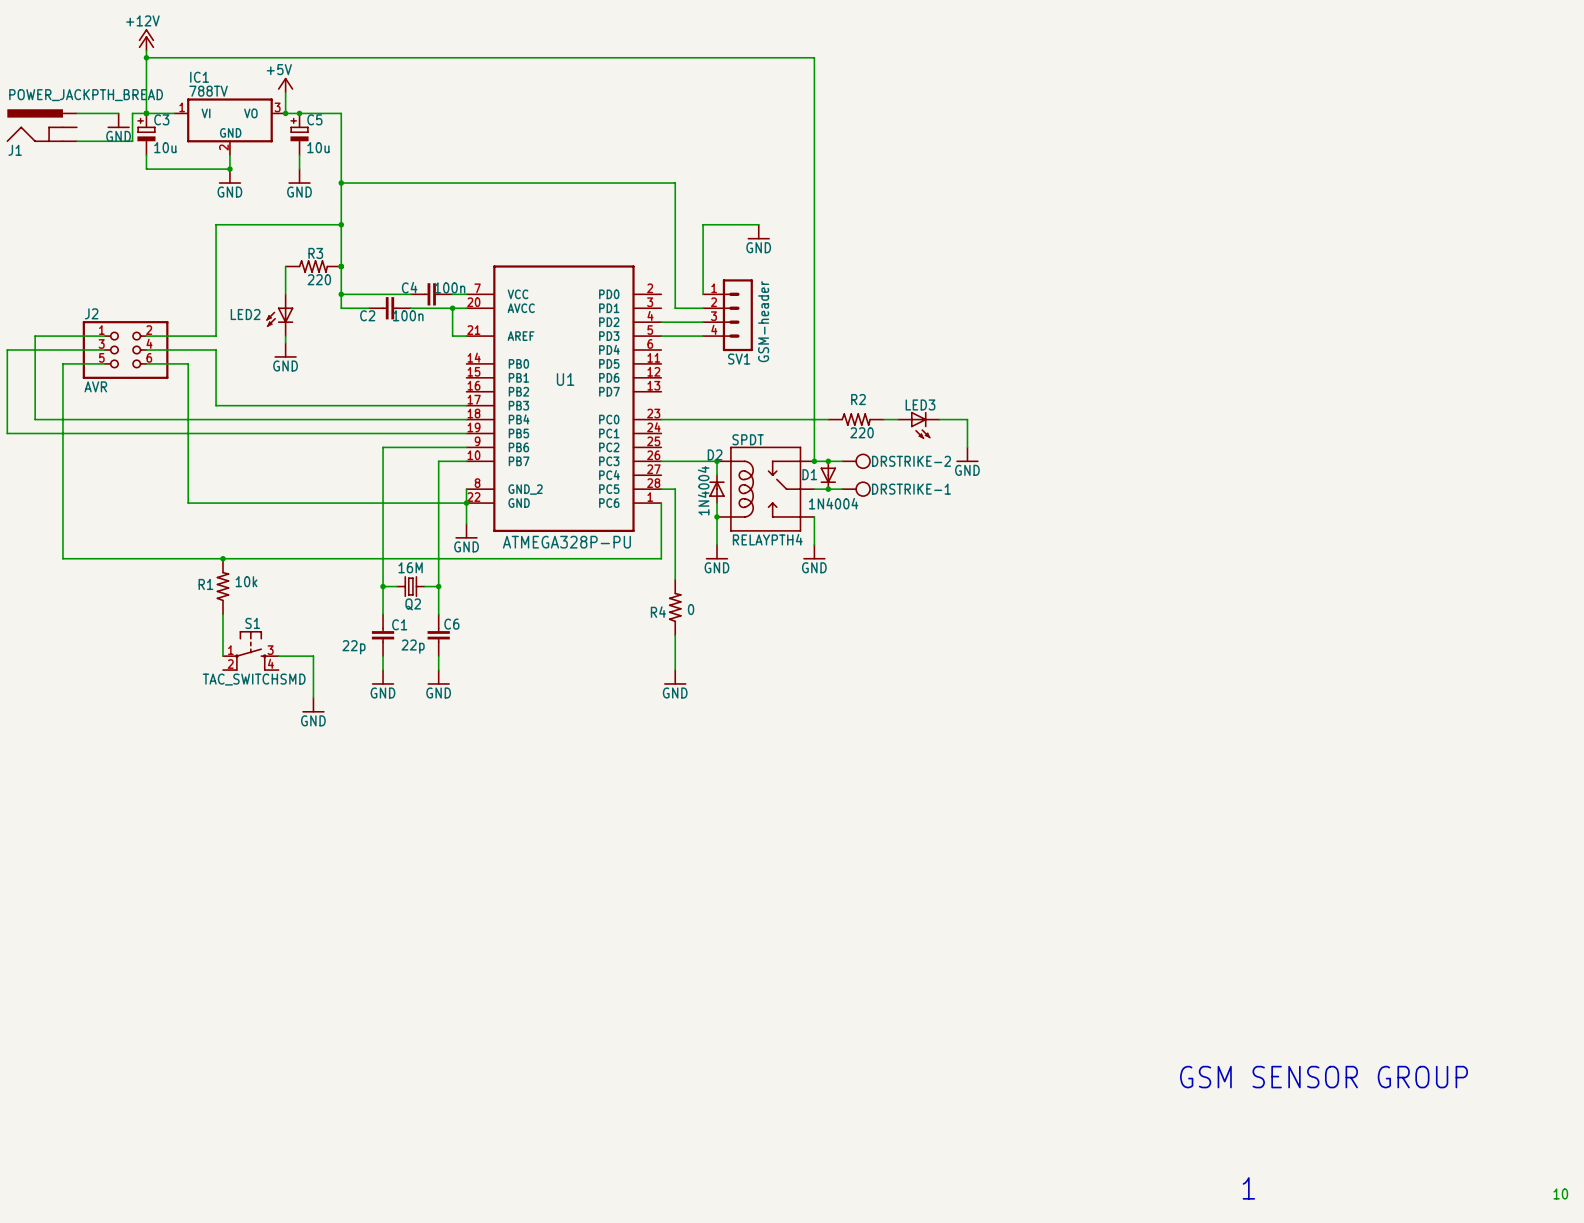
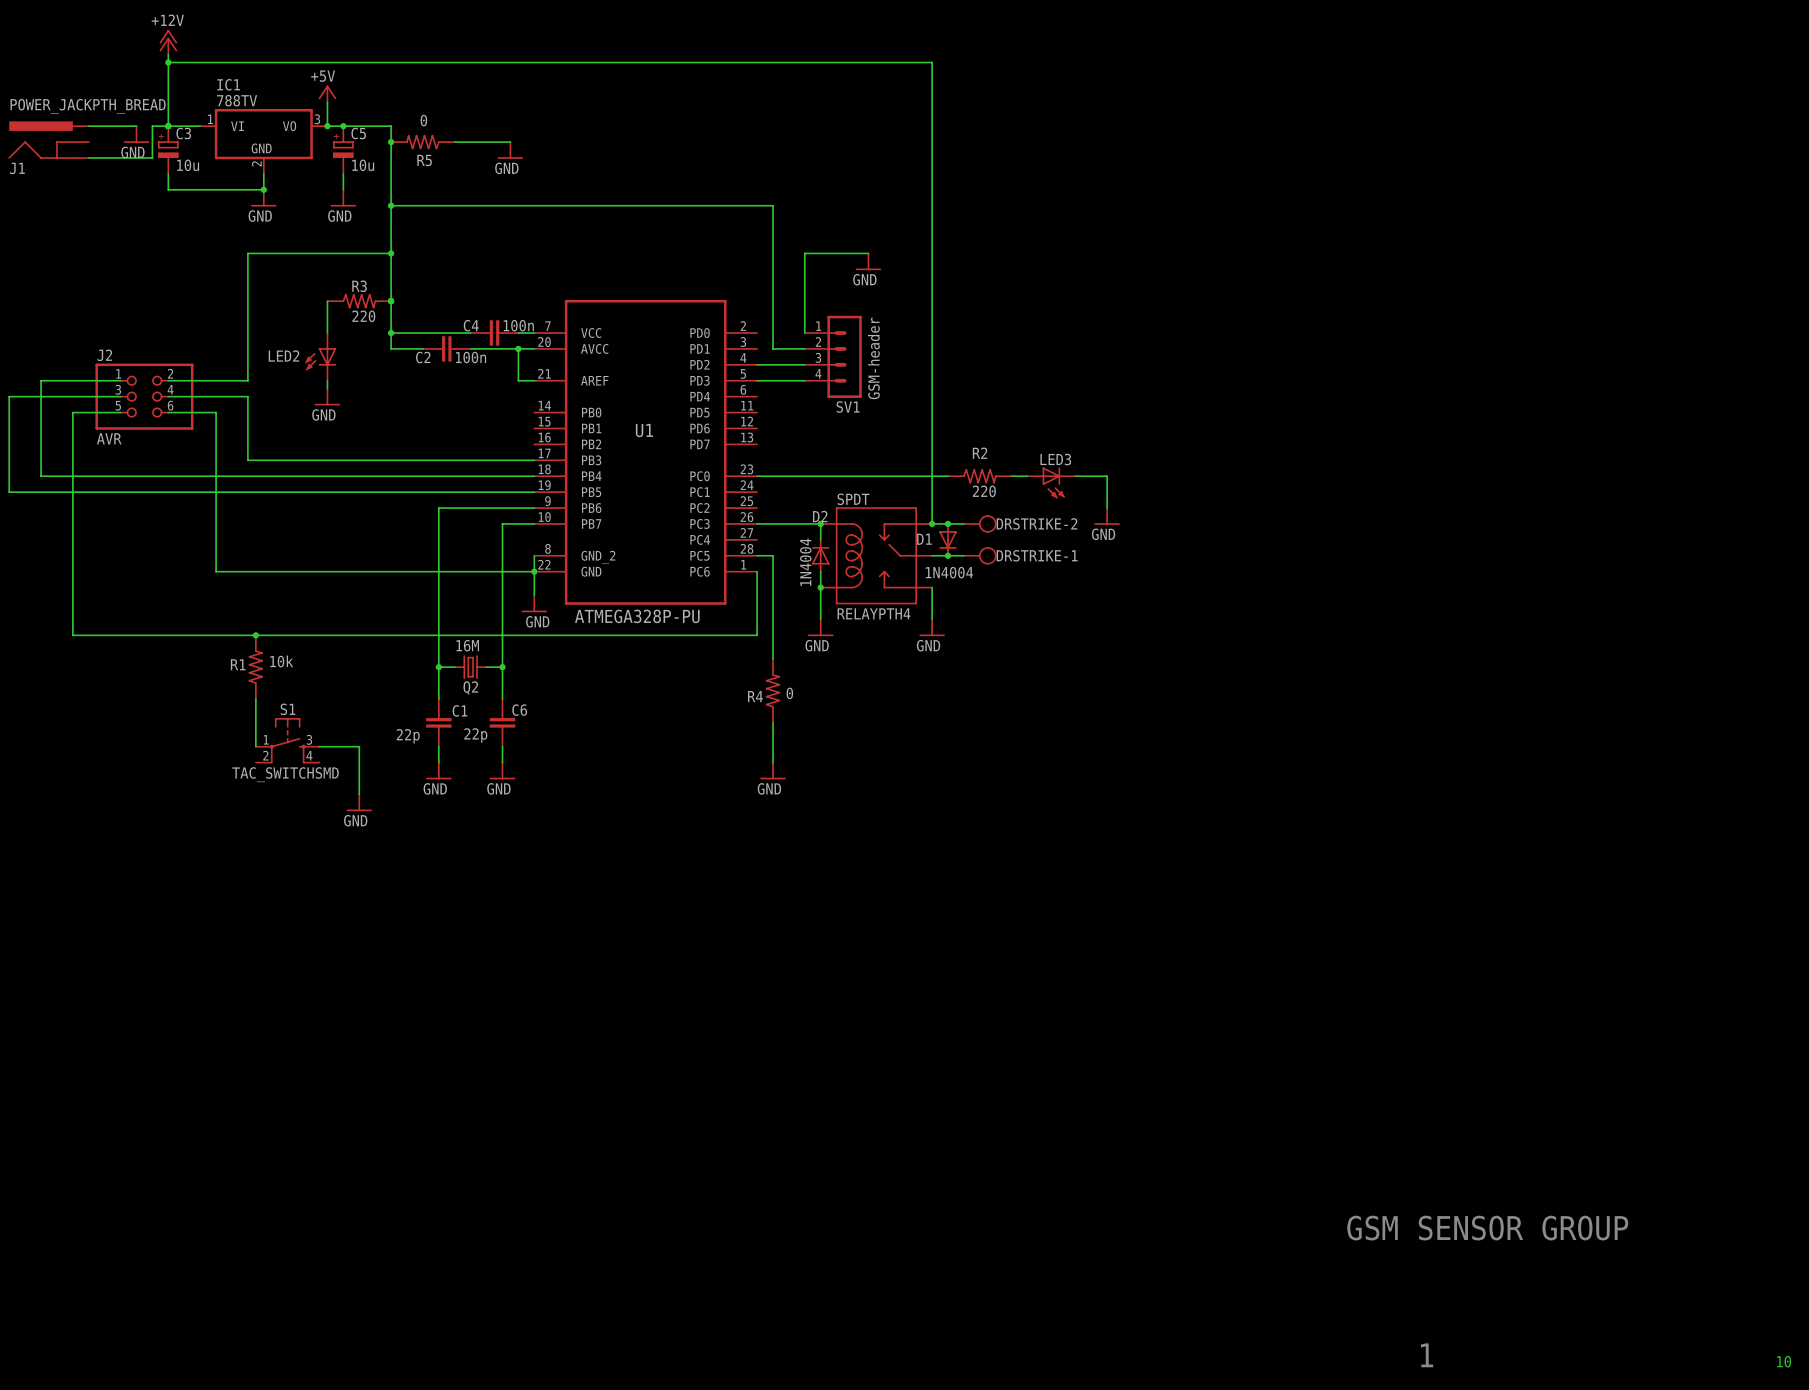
junction: none -> (391, 142)
R5: none -> 0 (422, 142)
wire: none -> (454, 142) (510, 142)
power symbol: none -> GND (510, 150)

